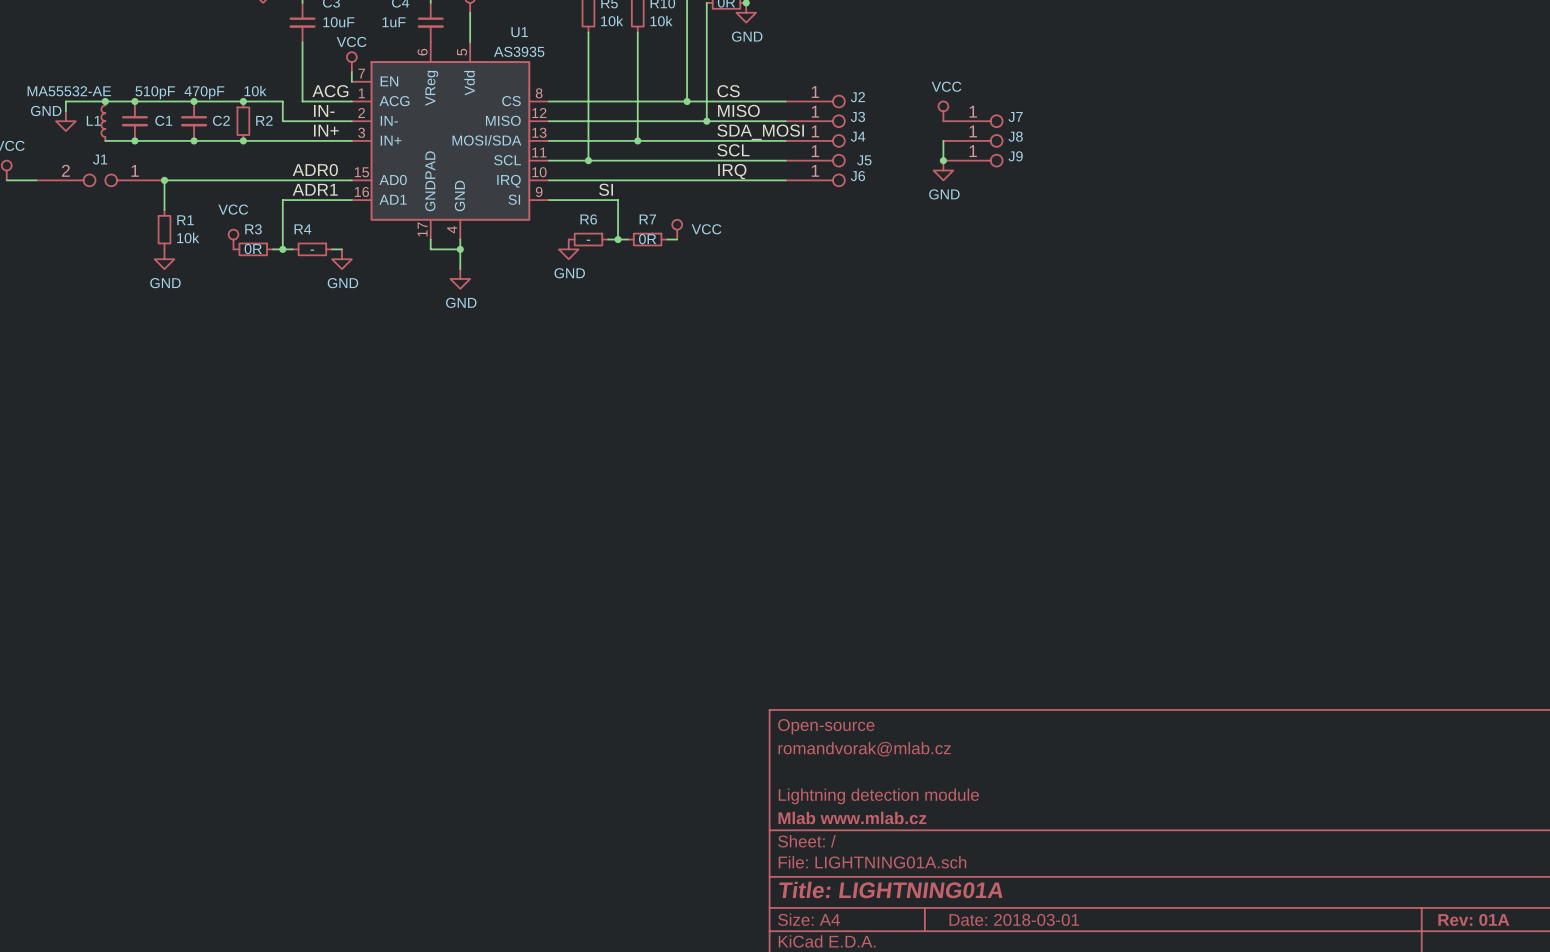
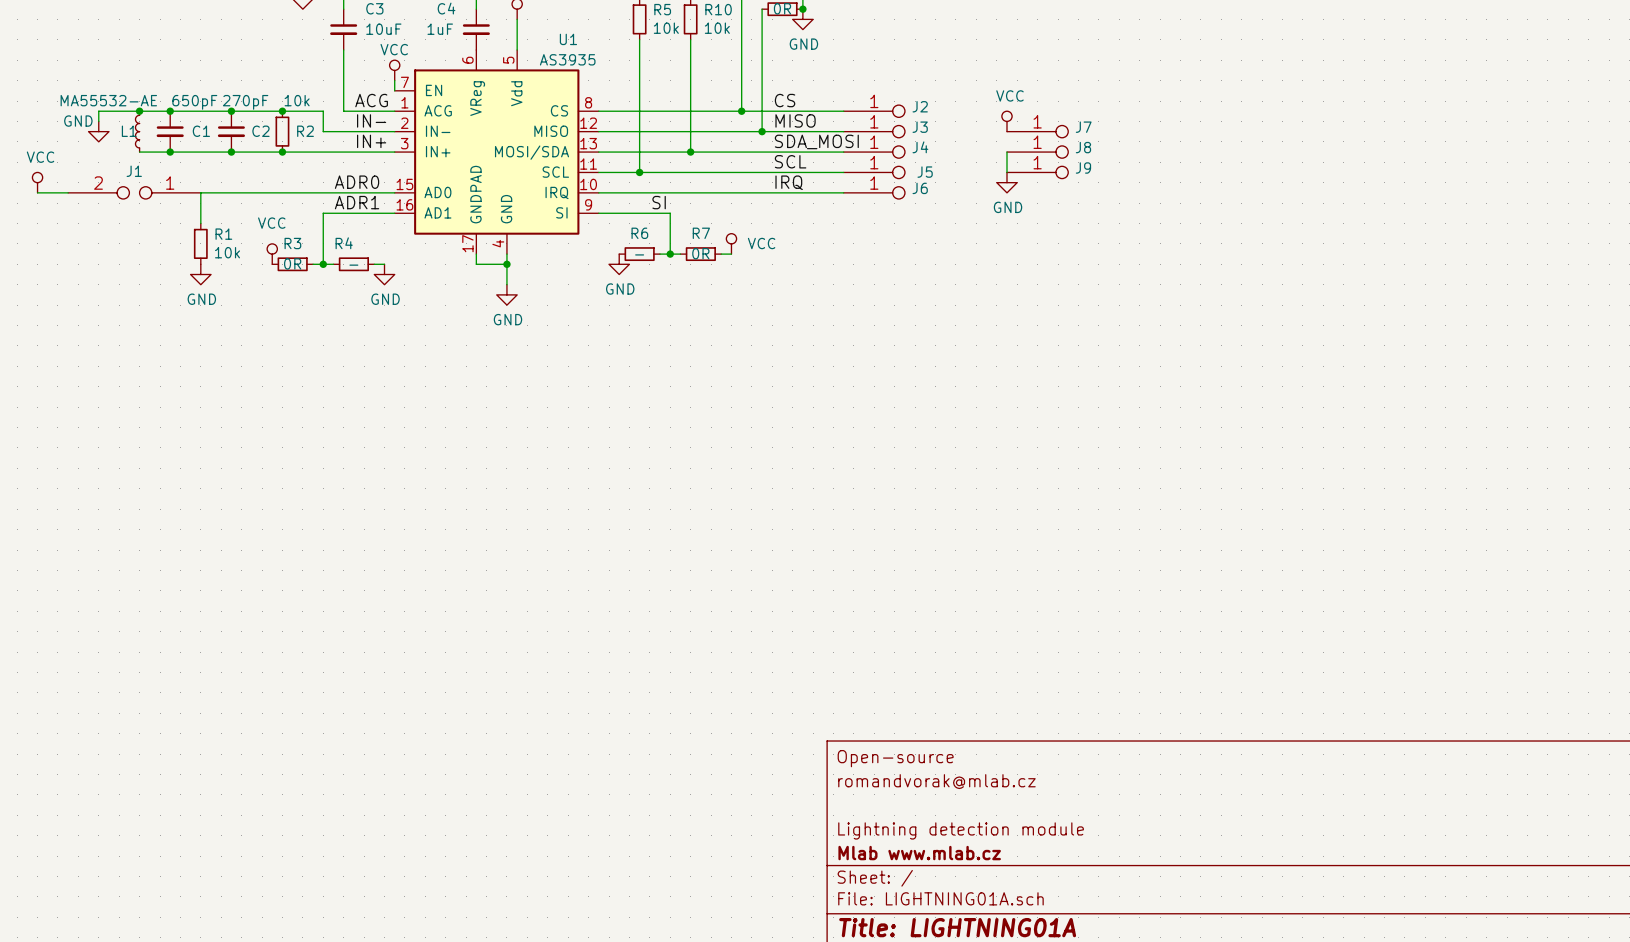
C1 value: 510pF (155, 92) -> 650pF (194, 102)
C2 value: 470pF (204, 92) -> 270pF (245, 102)
junction: (943, 160) -> none
junction: (164, 180) -> none

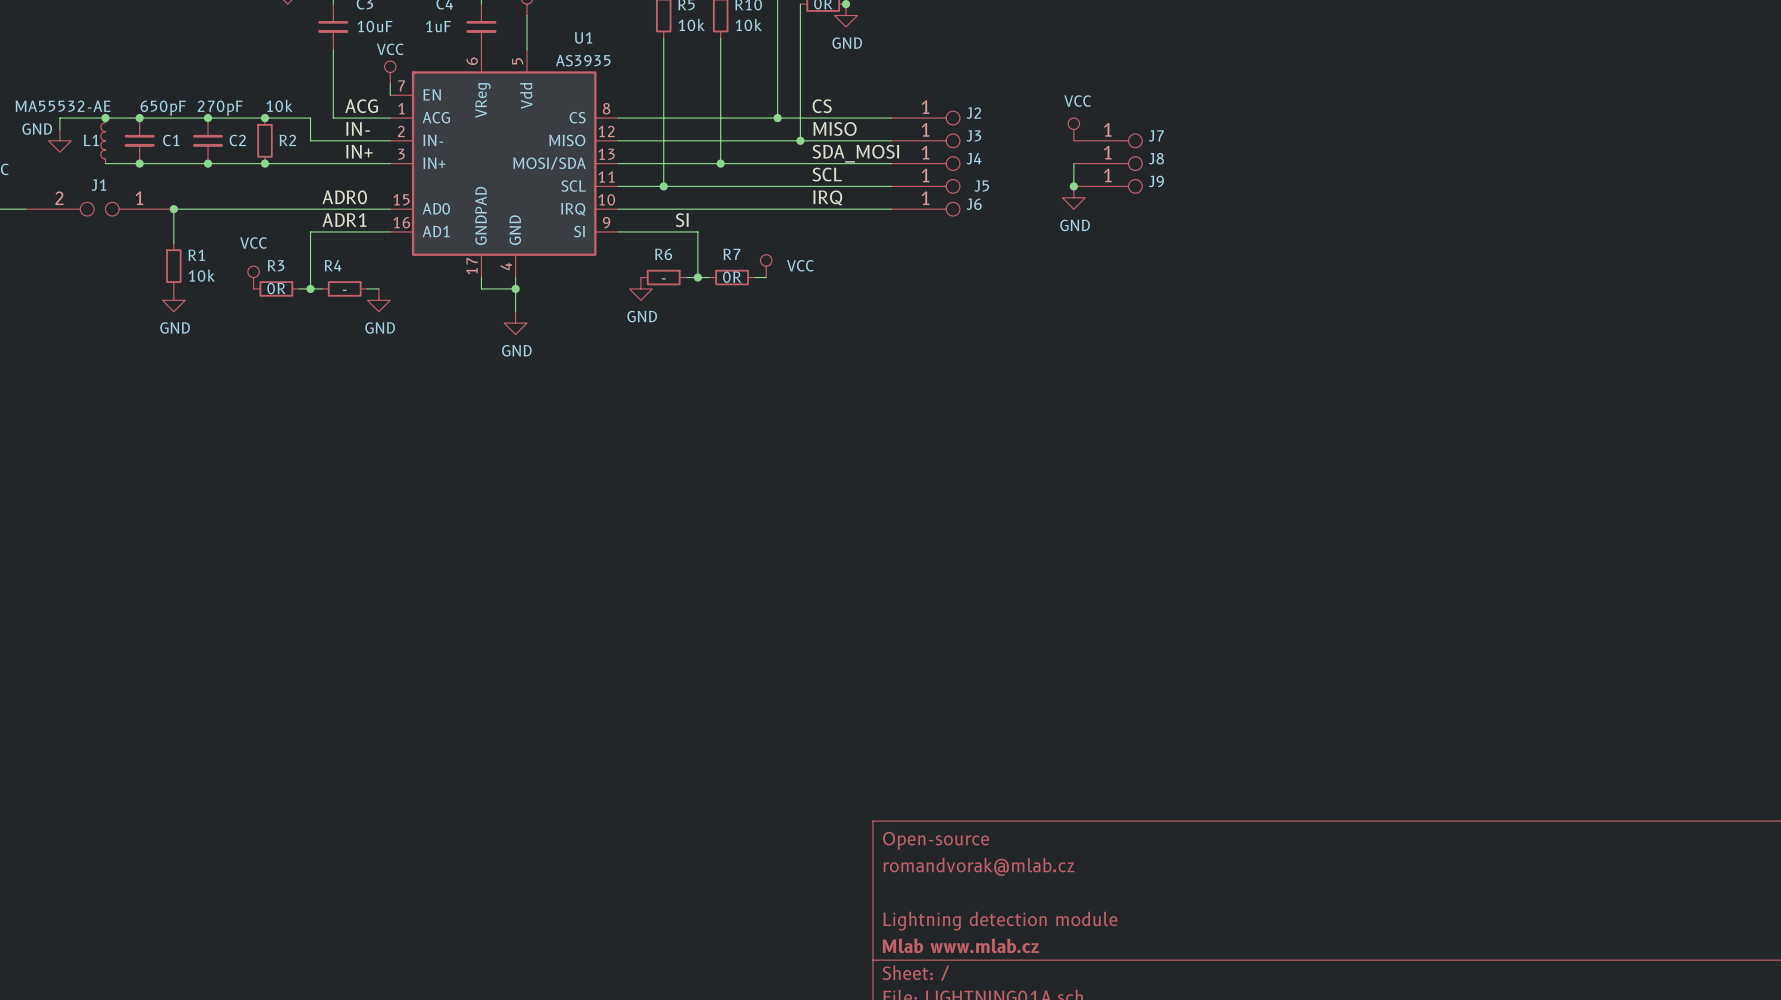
junction: none -> (1073, 186)
junction: none -> (173, 209)

